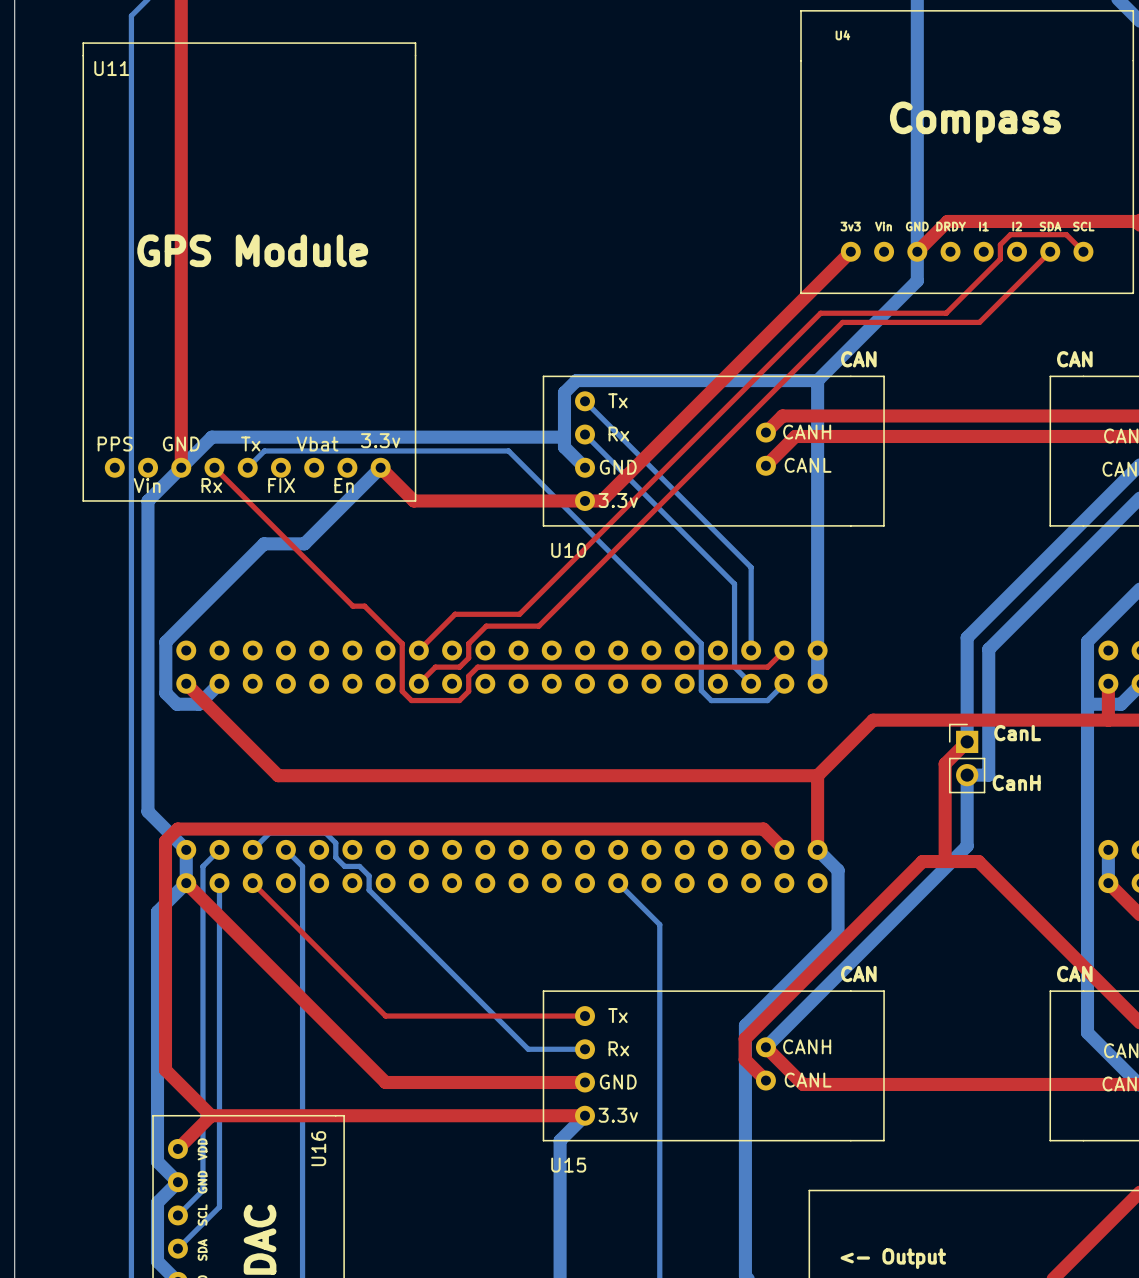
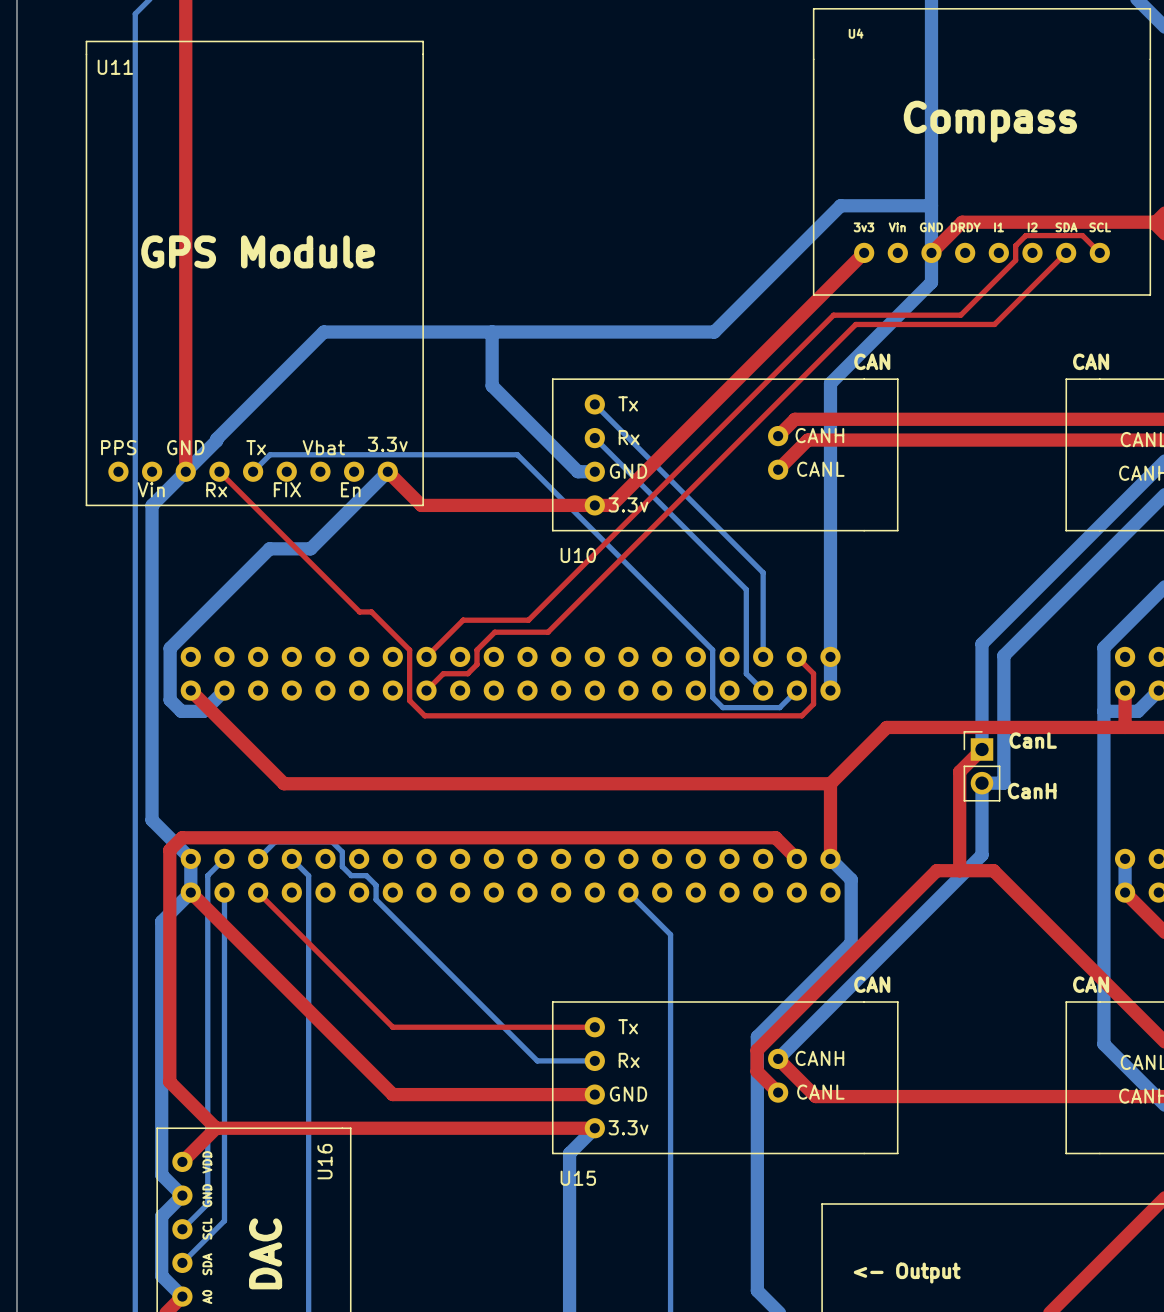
bottom track: (817, 380) (576, 380) (564, 392) (564, 447) (585, 467) -> (492, 332) (492, 385) (577, 471) (594, 471)
bottom track: (211, 437) (564, 437) -> (216, 440) (323, 332) (714, 332) (840, 205) (931, 205)
top track: (784, 650) (767, 667) (477, 667) (468, 676) (468, 691) (459, 700) (411, 700) (402, 691) -> (796, 656) (813, 673) (813, 704) (801, 715) (424, 715) (409, 700) (409, 698)

